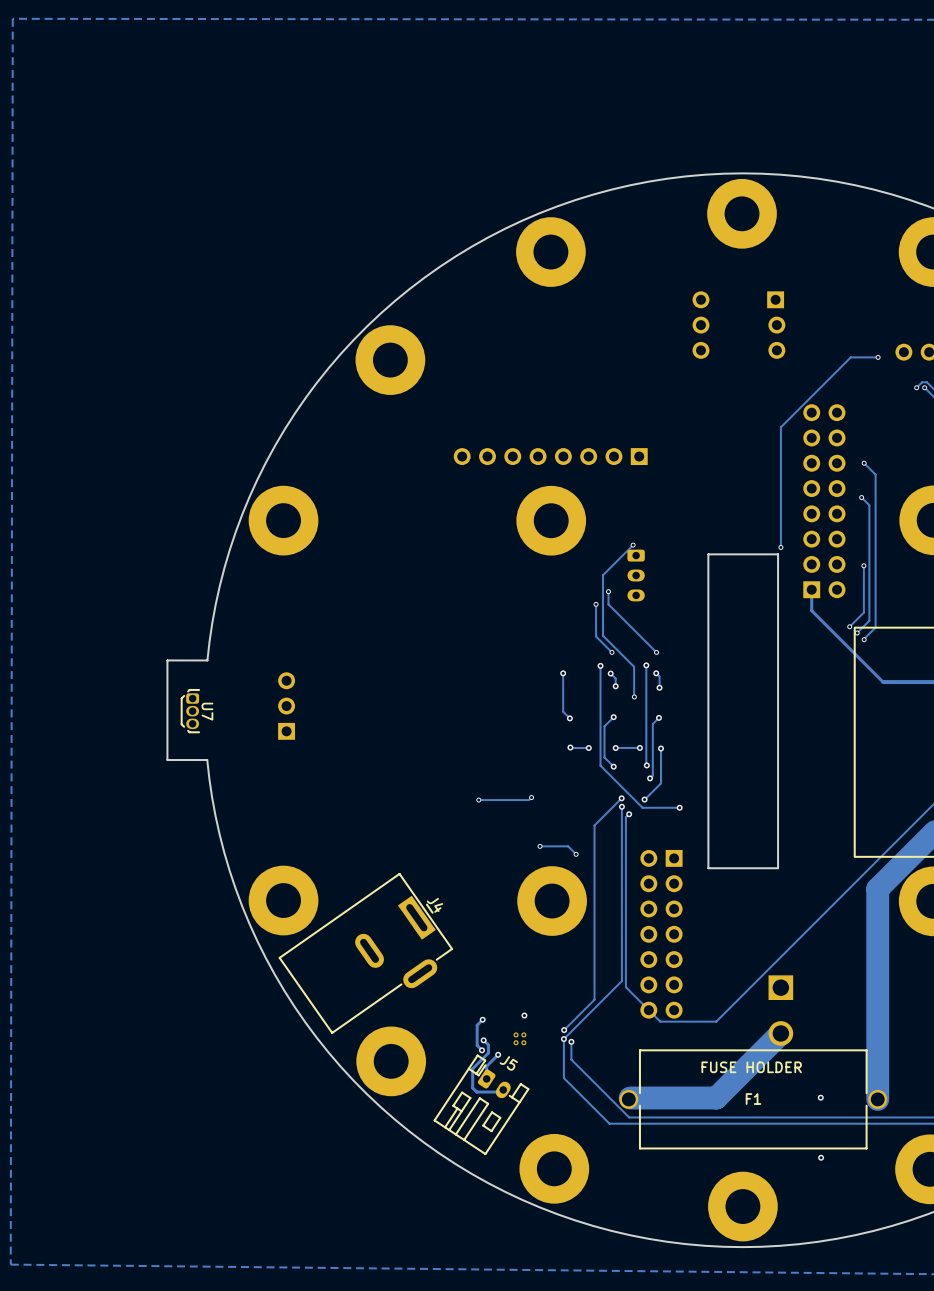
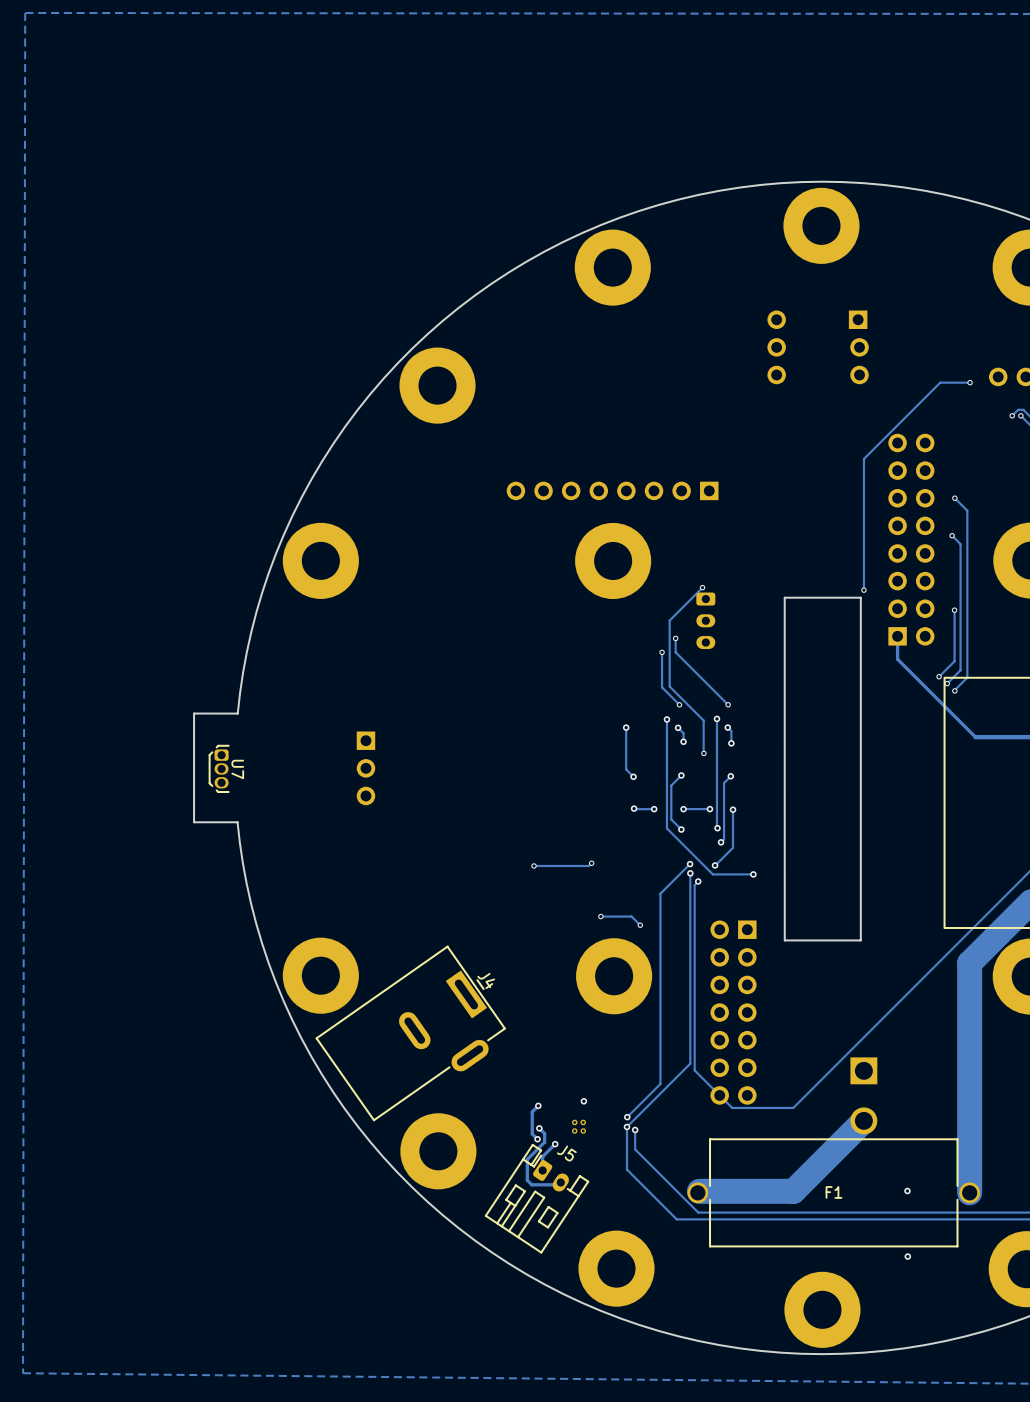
part rotation: 0° (286, 706) -> 180° (365, 768)
text: FUSE HOLDER (751, 1067) -> none

